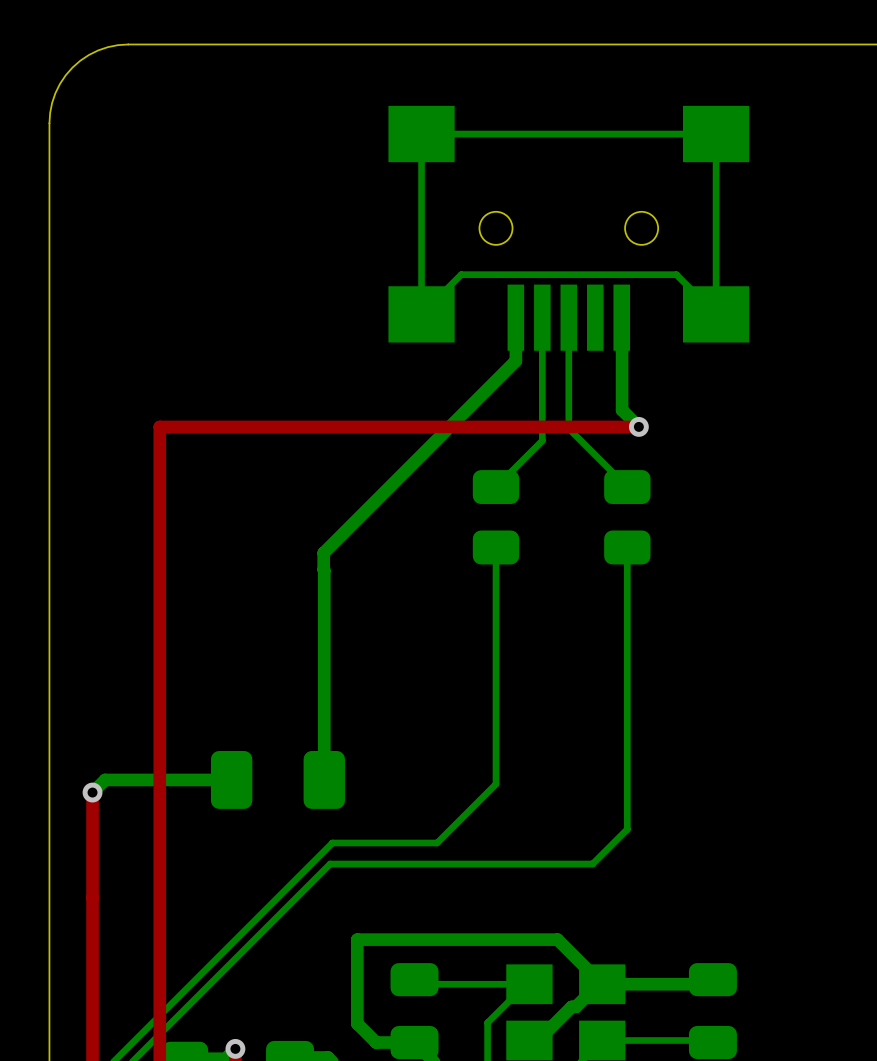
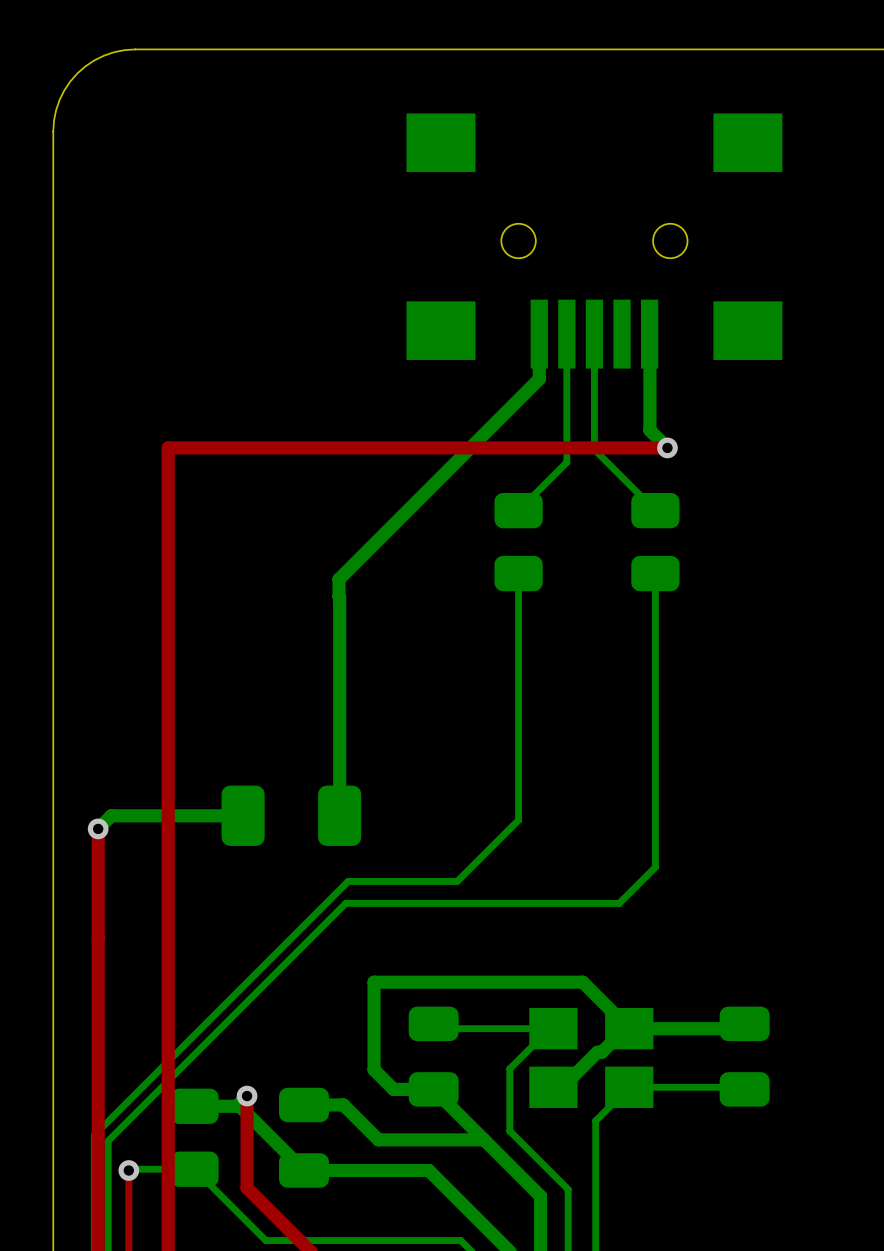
bottom track: (421, 134) (421, 314) (461, 274) (676, 274) (716, 314) (716, 134) (421, 134) -> none

